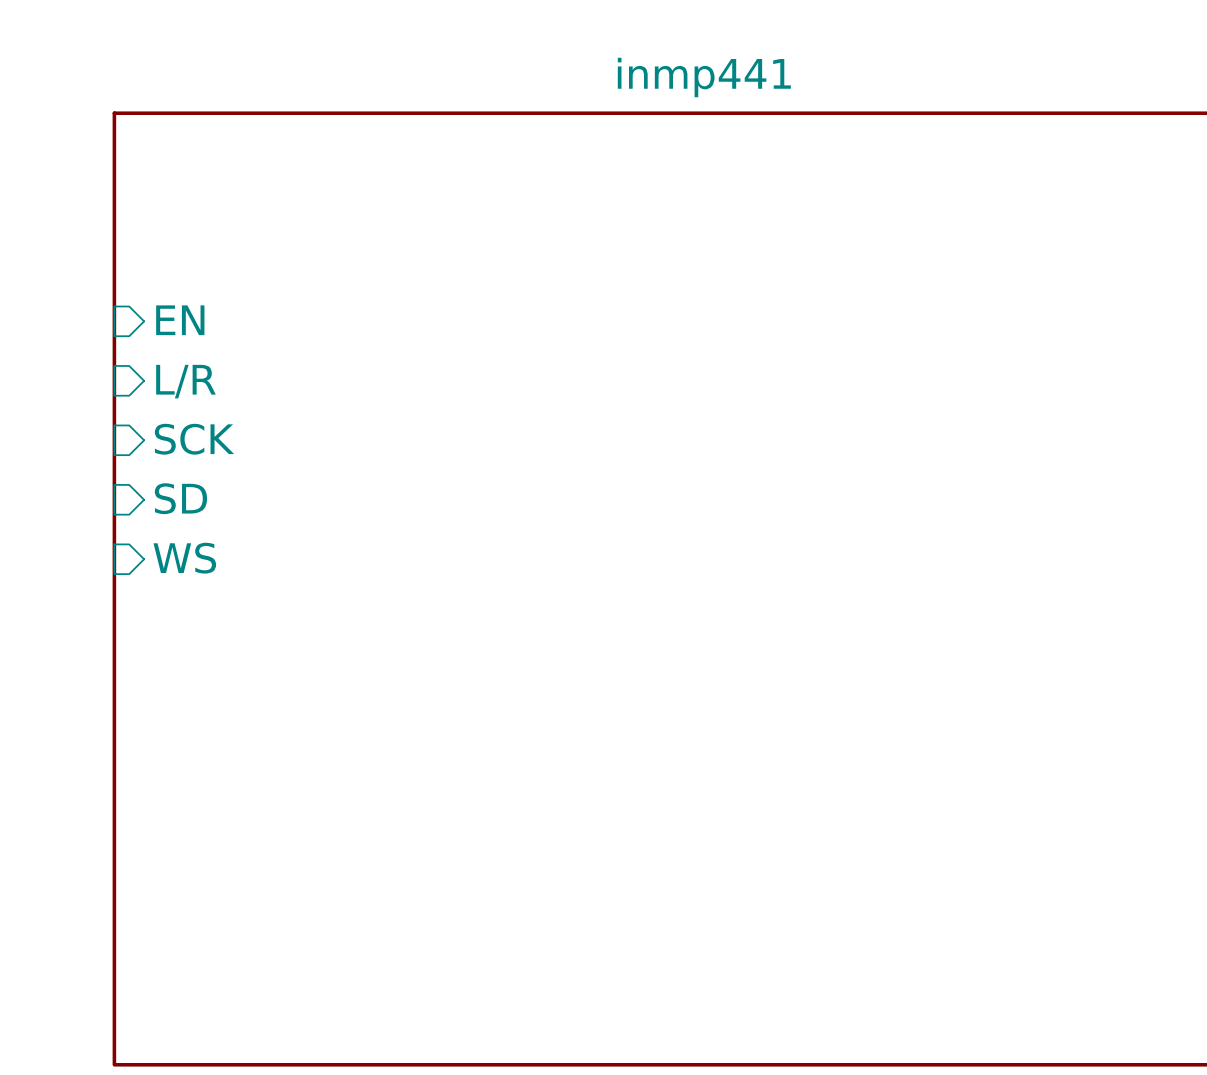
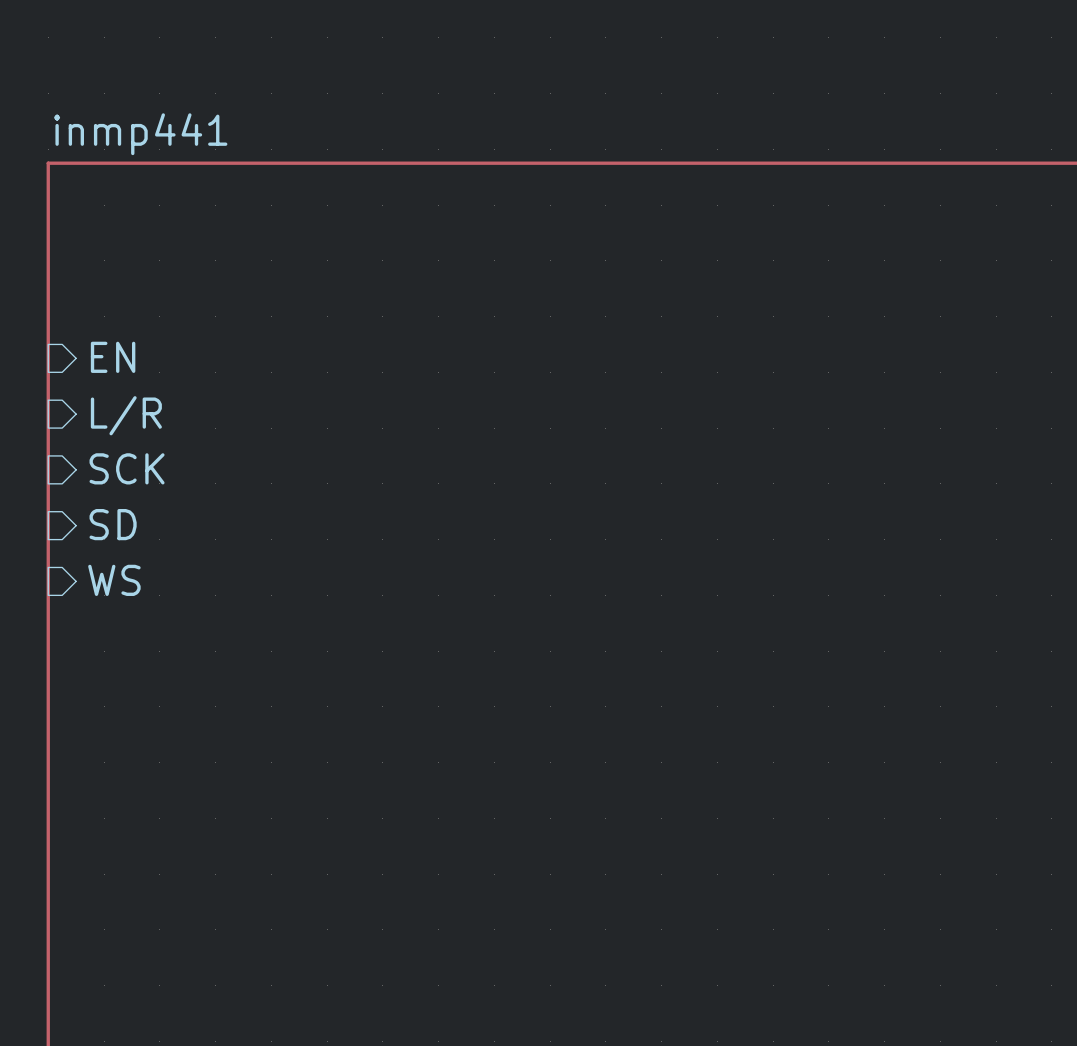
sheet inmp441 name position: inmp441 (704, 77) -> inmp441 (140, 134)

